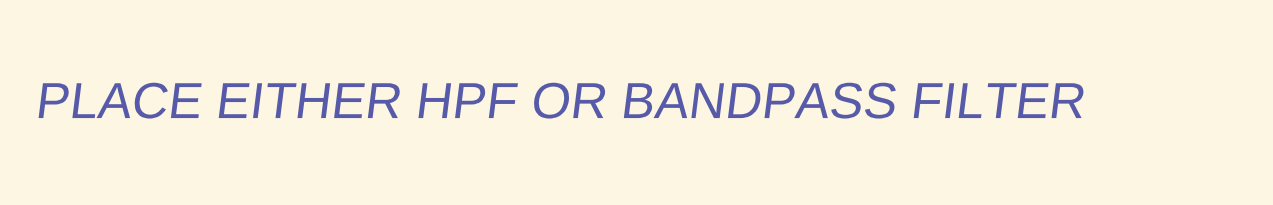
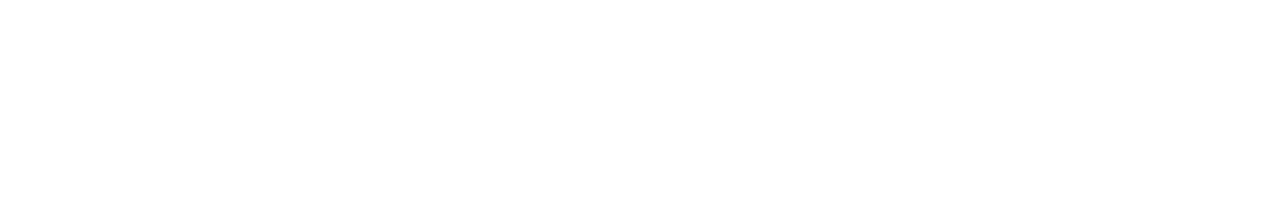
text: PLACE EITHER HPF OR BANDPASS FILTER (561, 100) -> none

